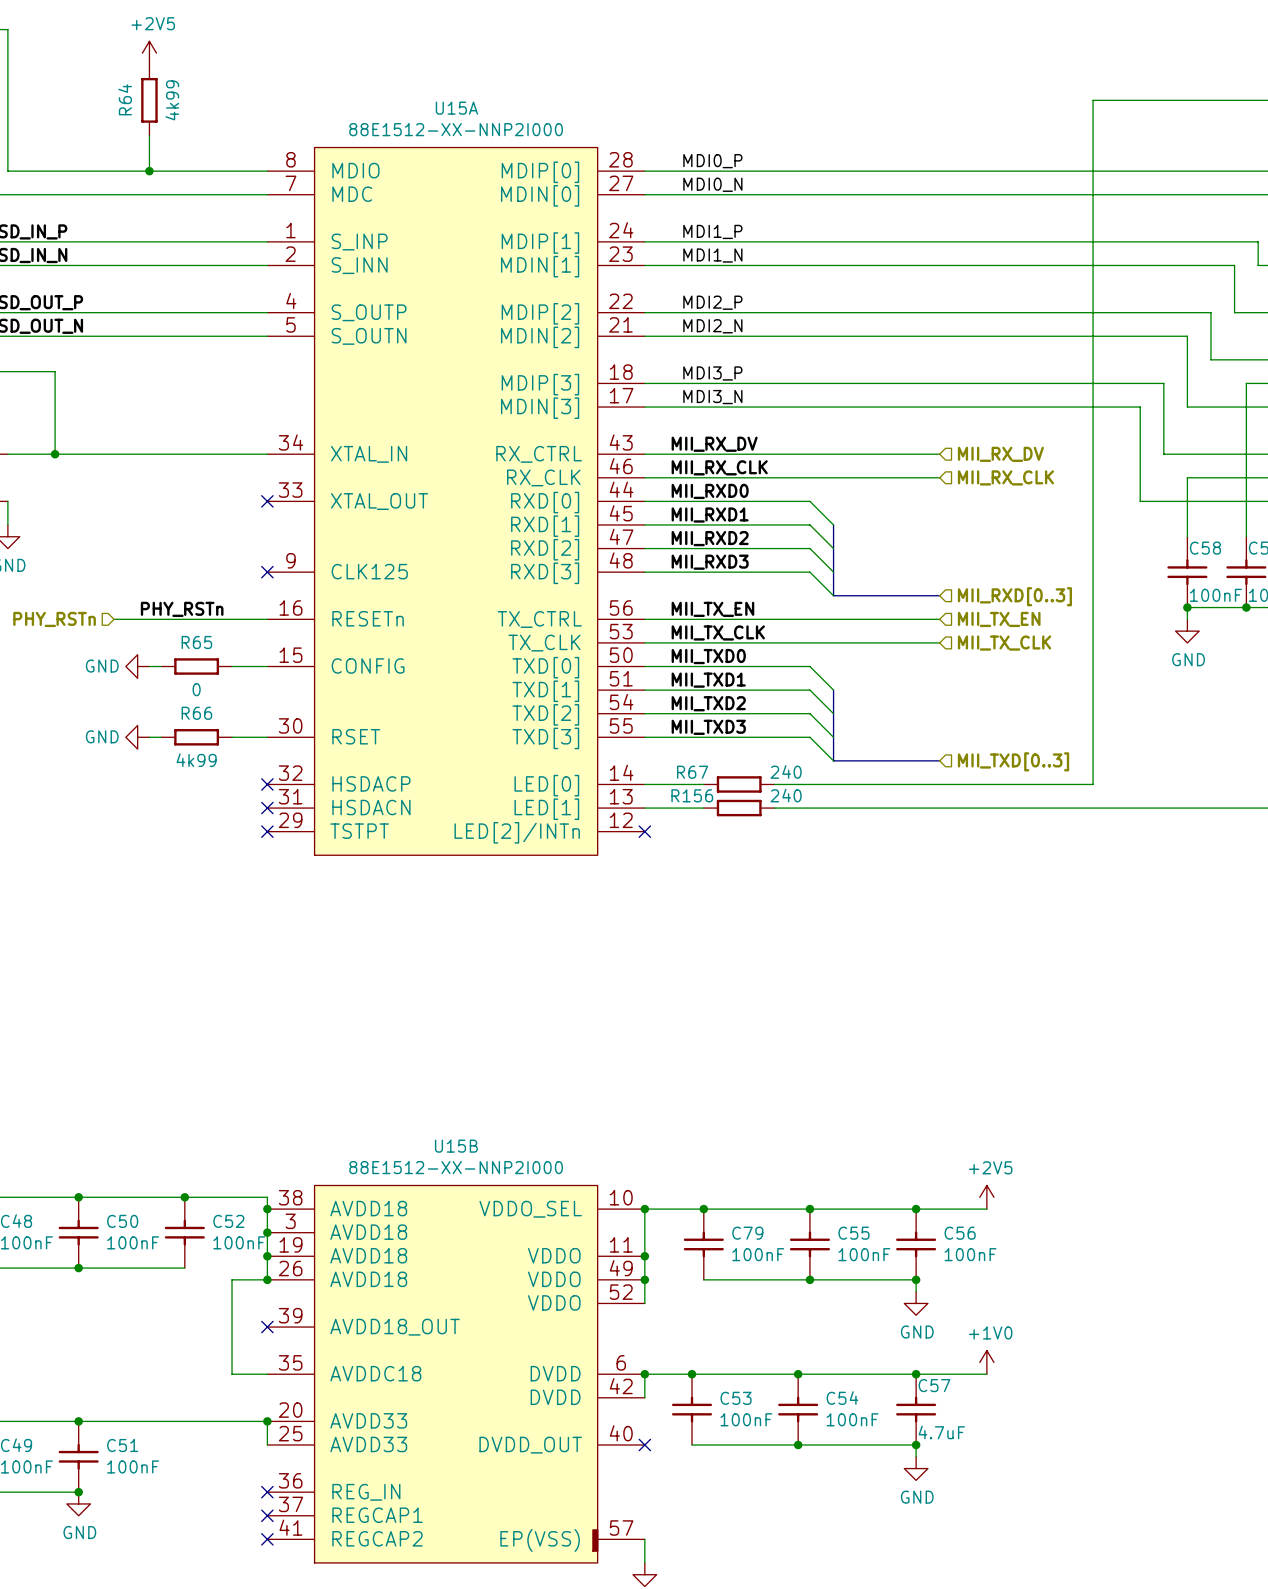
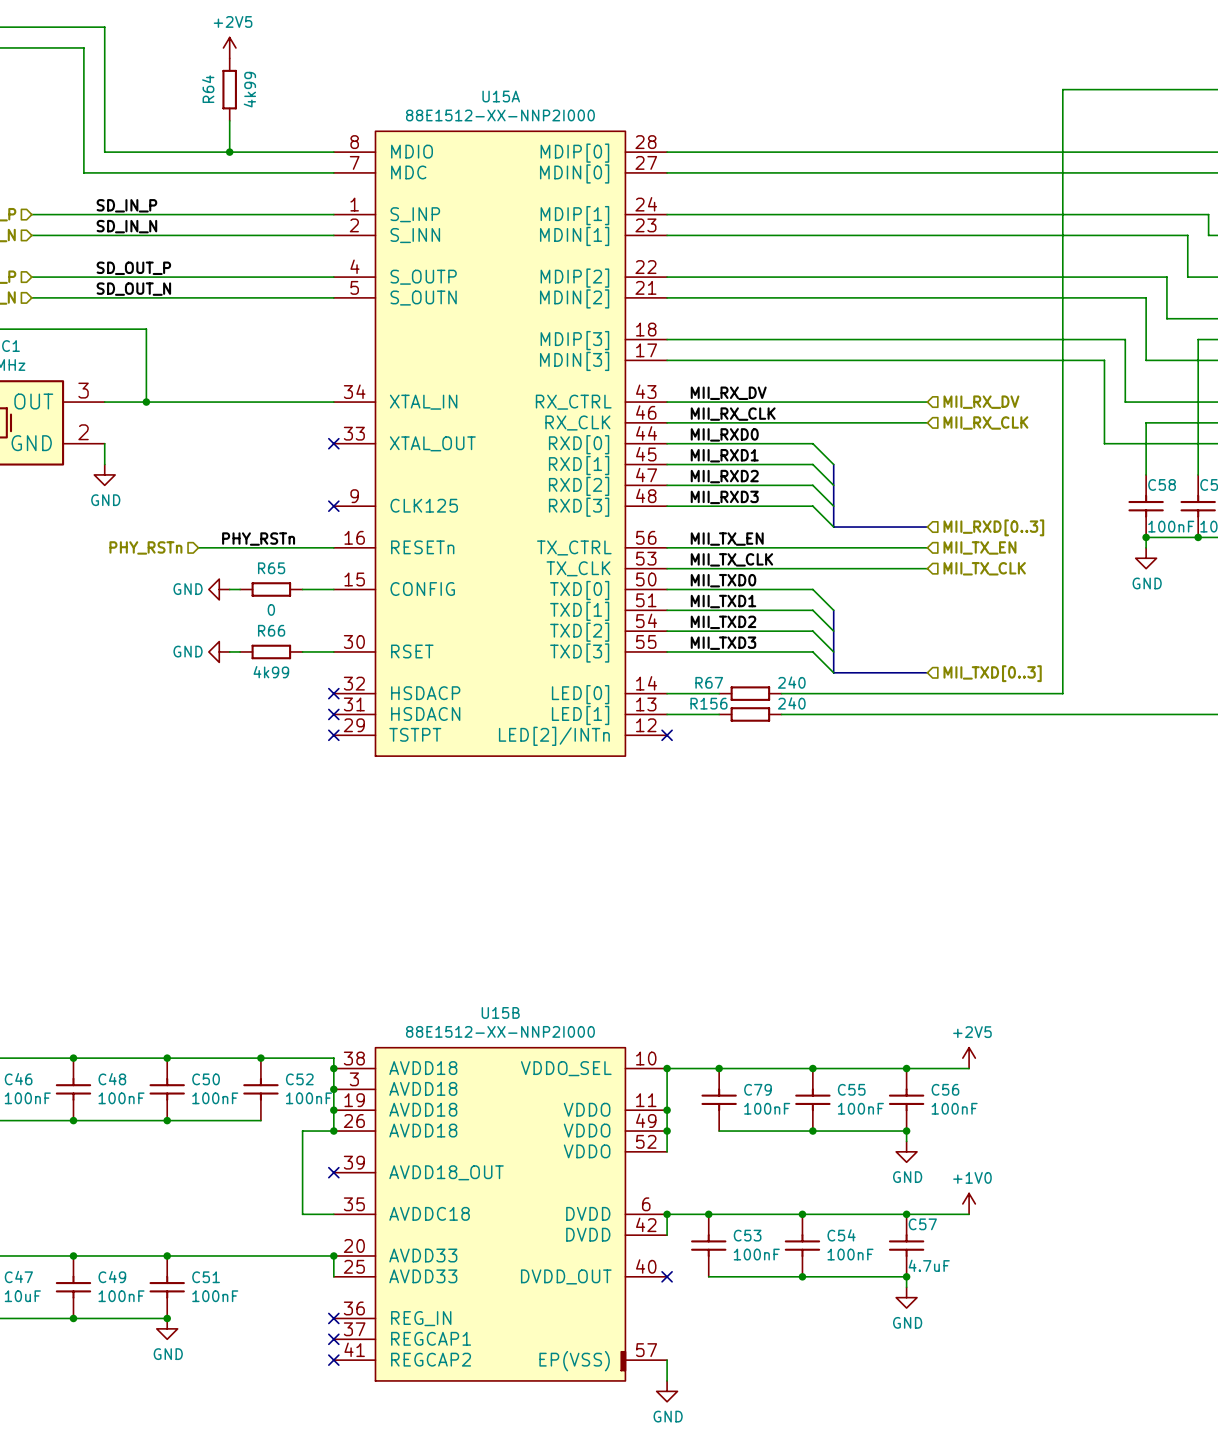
label: MDI0_P (712, 161) -> none
label: MDI0_N (712, 184) -> none
label: MDI1_P (712, 231) -> none
label: MDI1_N (712, 255) -> none
label: MDI2_P (712, 302) -> none
label: MDI2_N (712, 326) -> none
label: MDI3_P (712, 373) -> none
label: MDI3_N (712, 397) -> none

